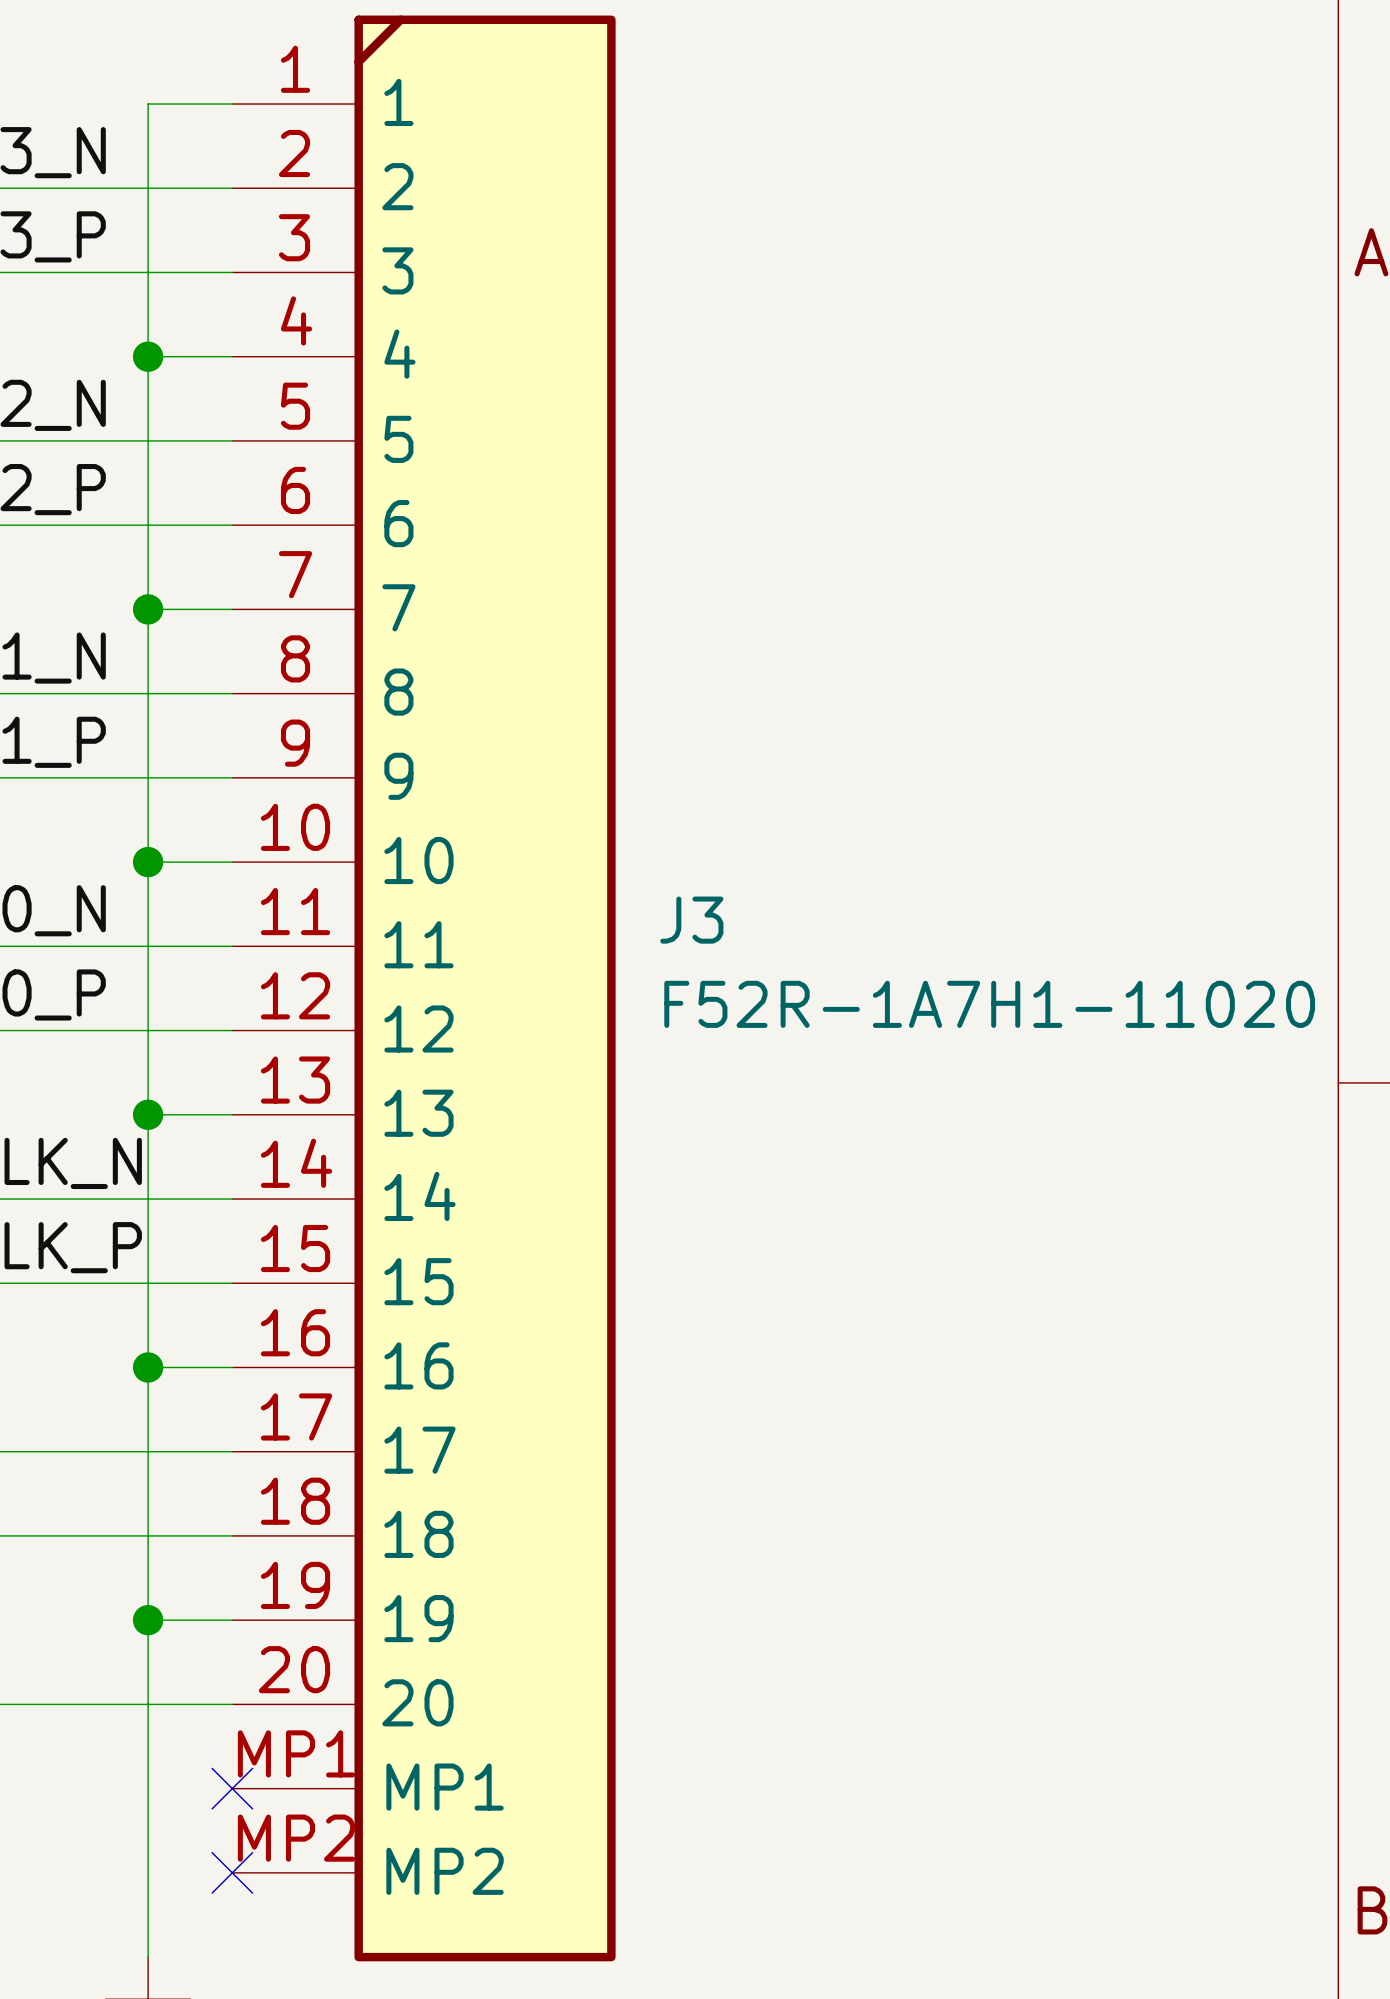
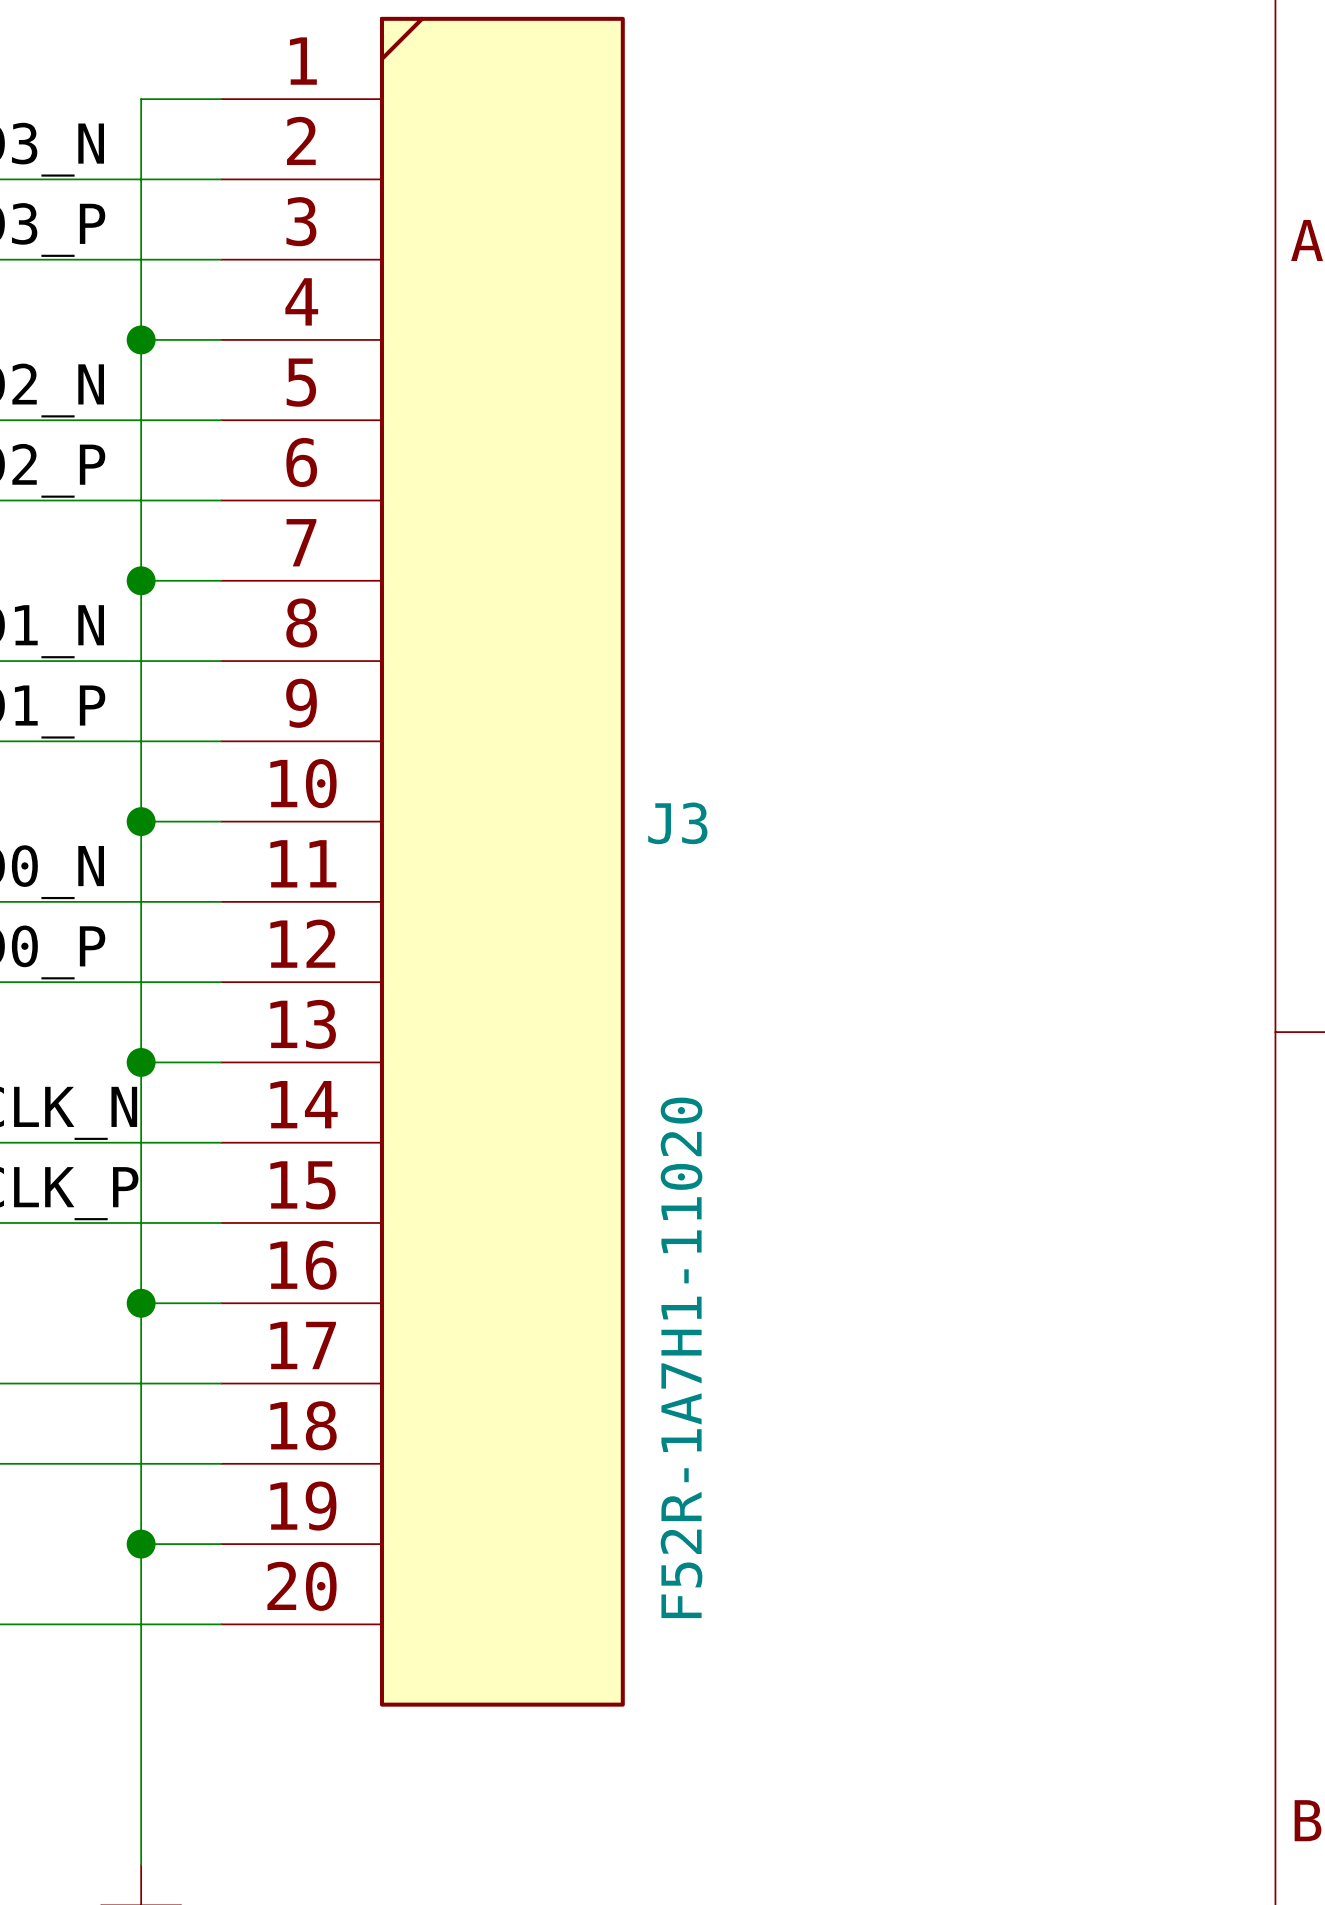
J3 symbol: [232, 15, 616, 1962] -> [221, 16, 625, 1707]
J3 text: F52R-1A7H1-11020 (989, 1004) -> none
J3 value: none -> F52R-1A7H1-11020 (681, 1357)
no-connect mark: (232, 1788) -> none
no-connect mark: (232, 1872) -> none

